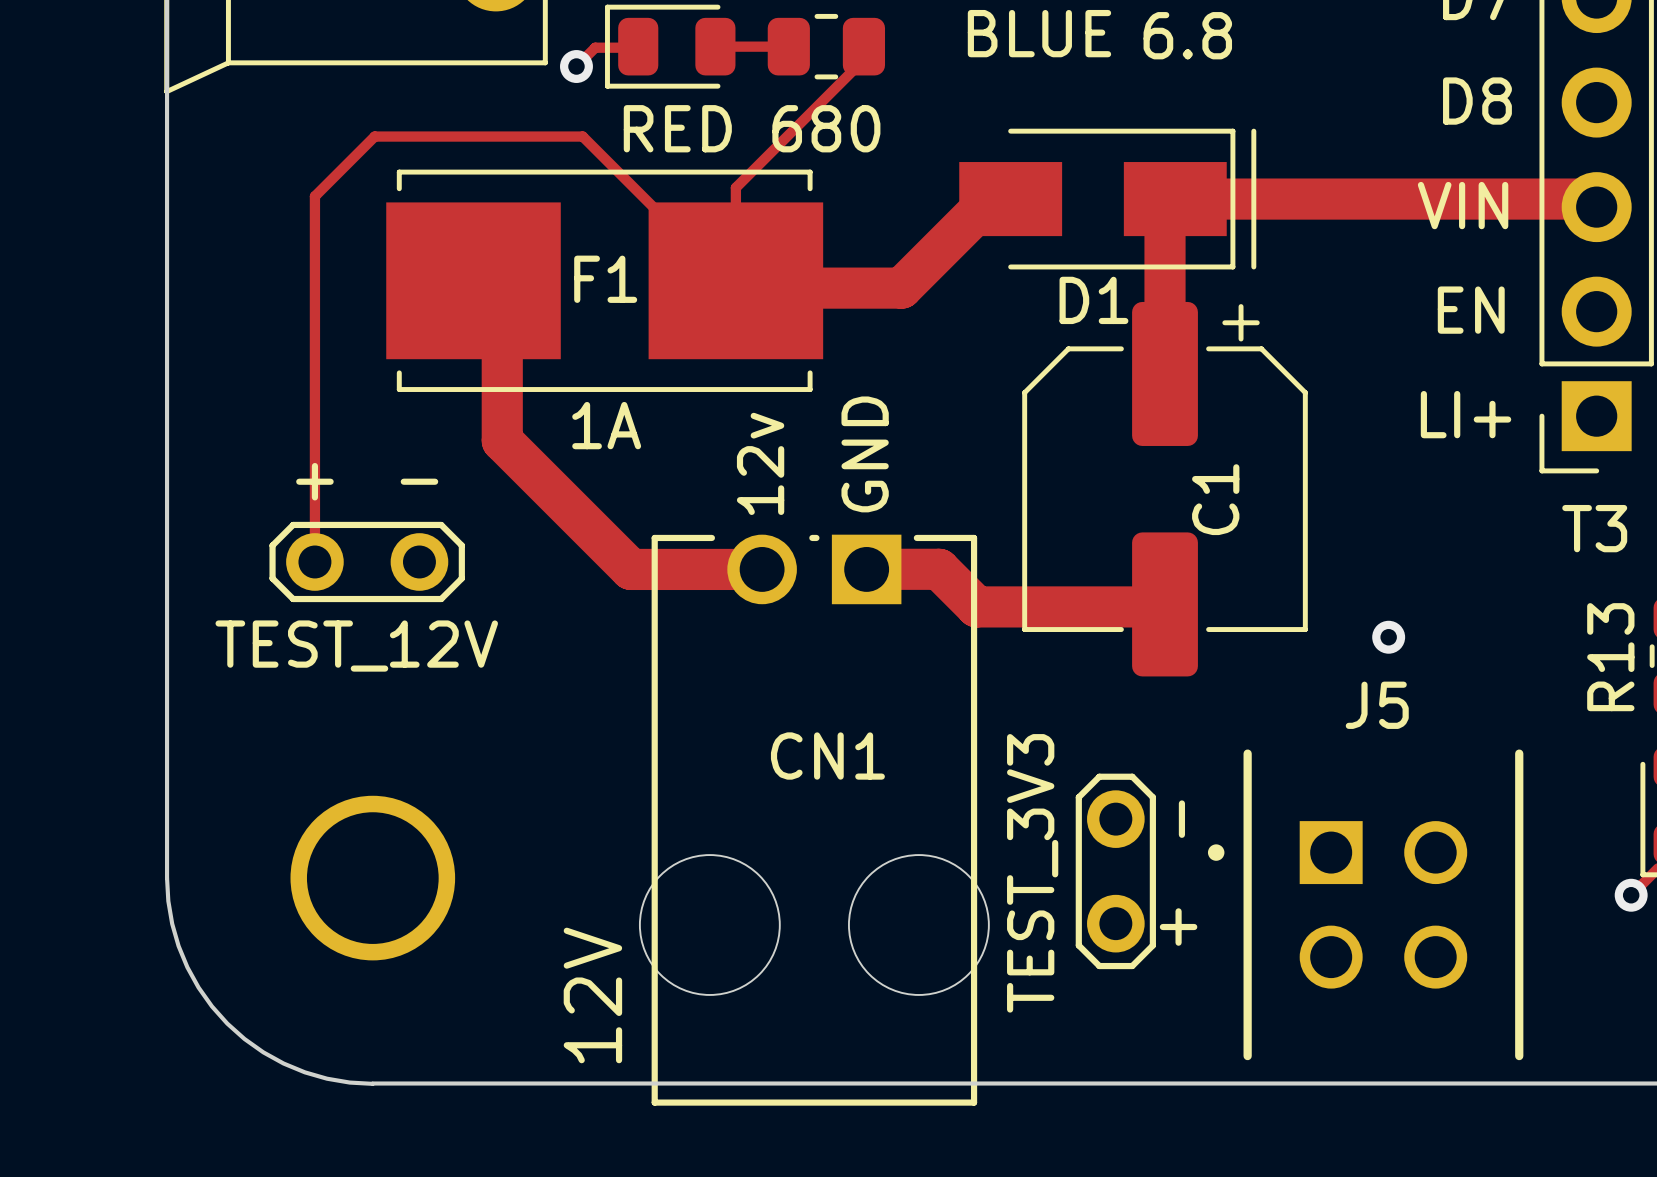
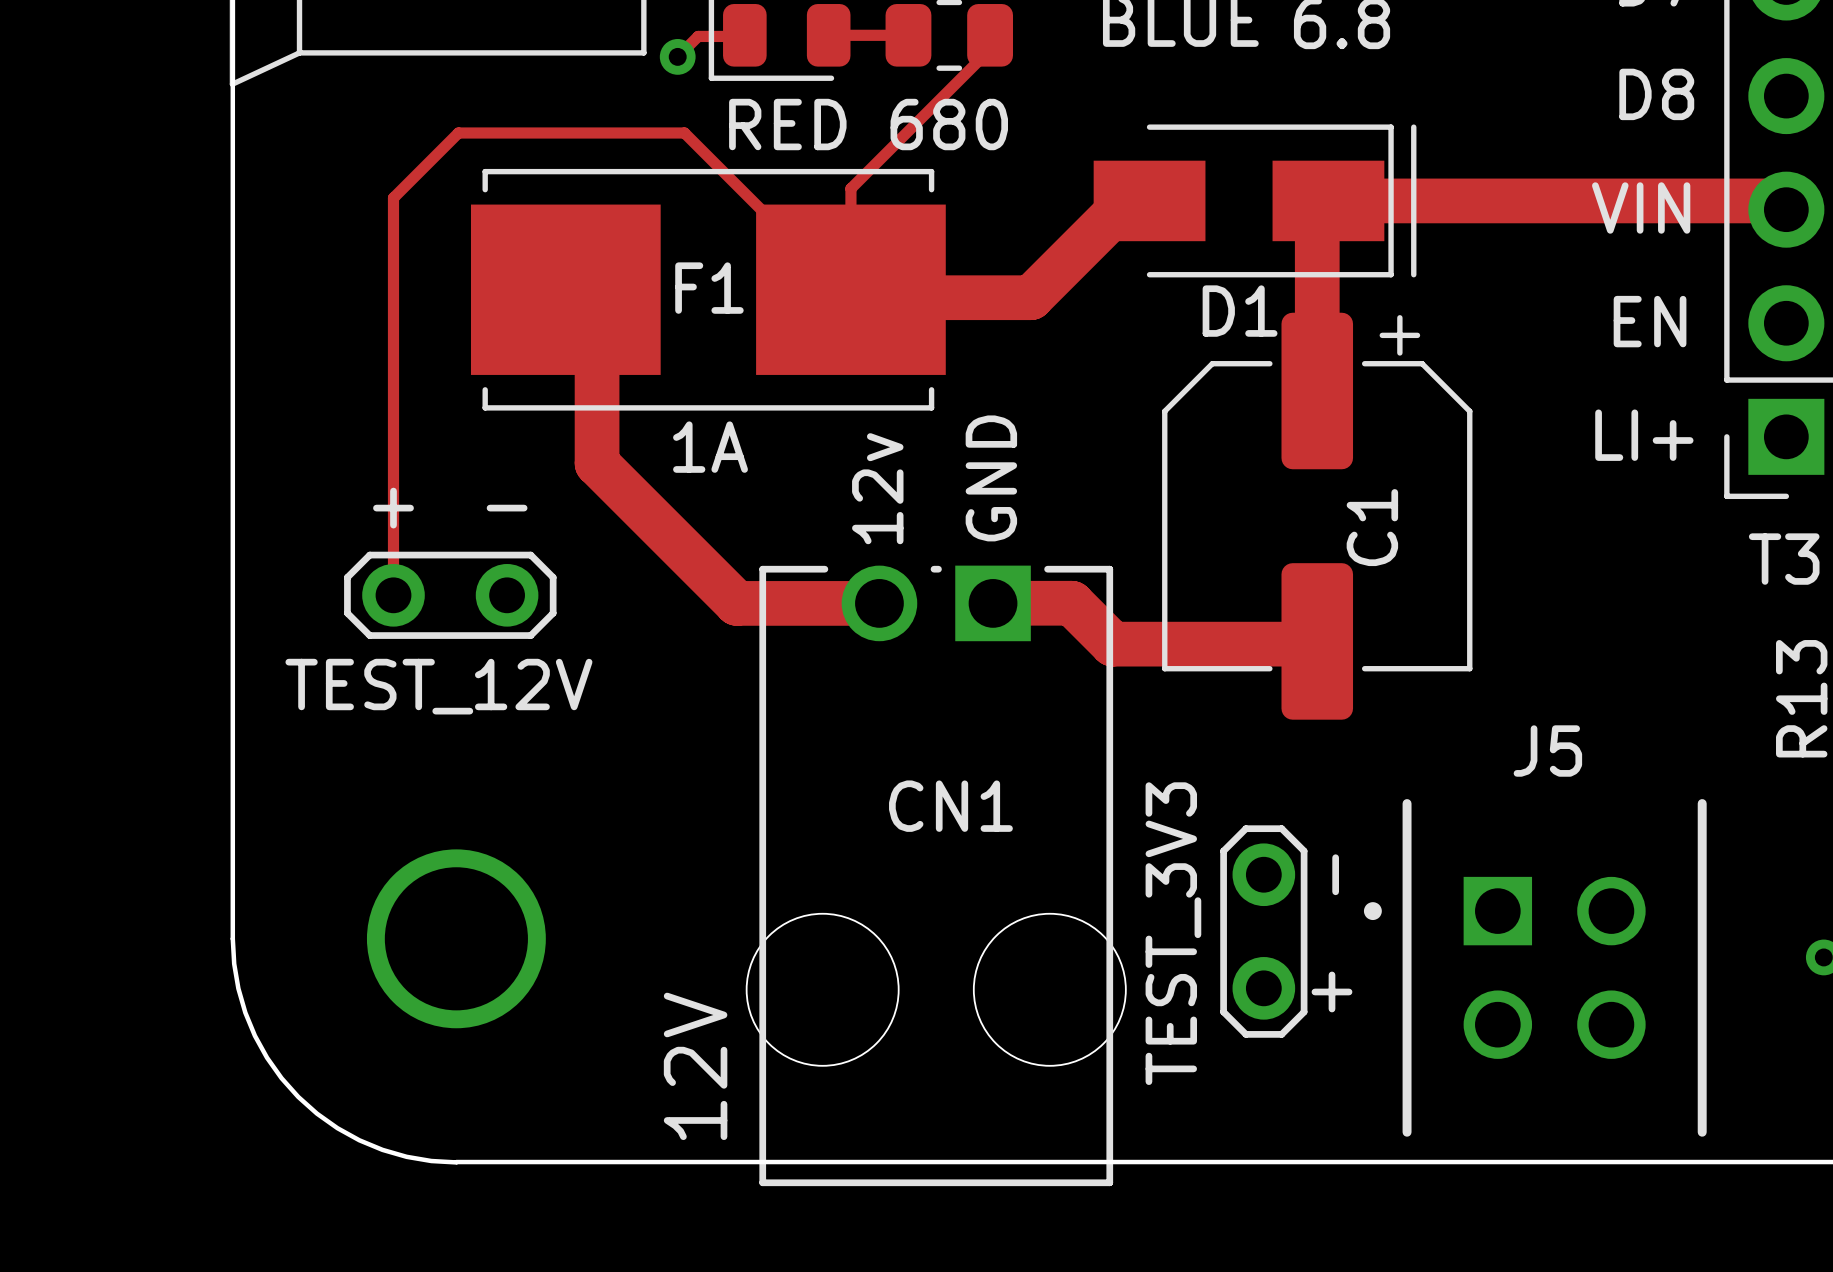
via: (1388, 637) -> none

